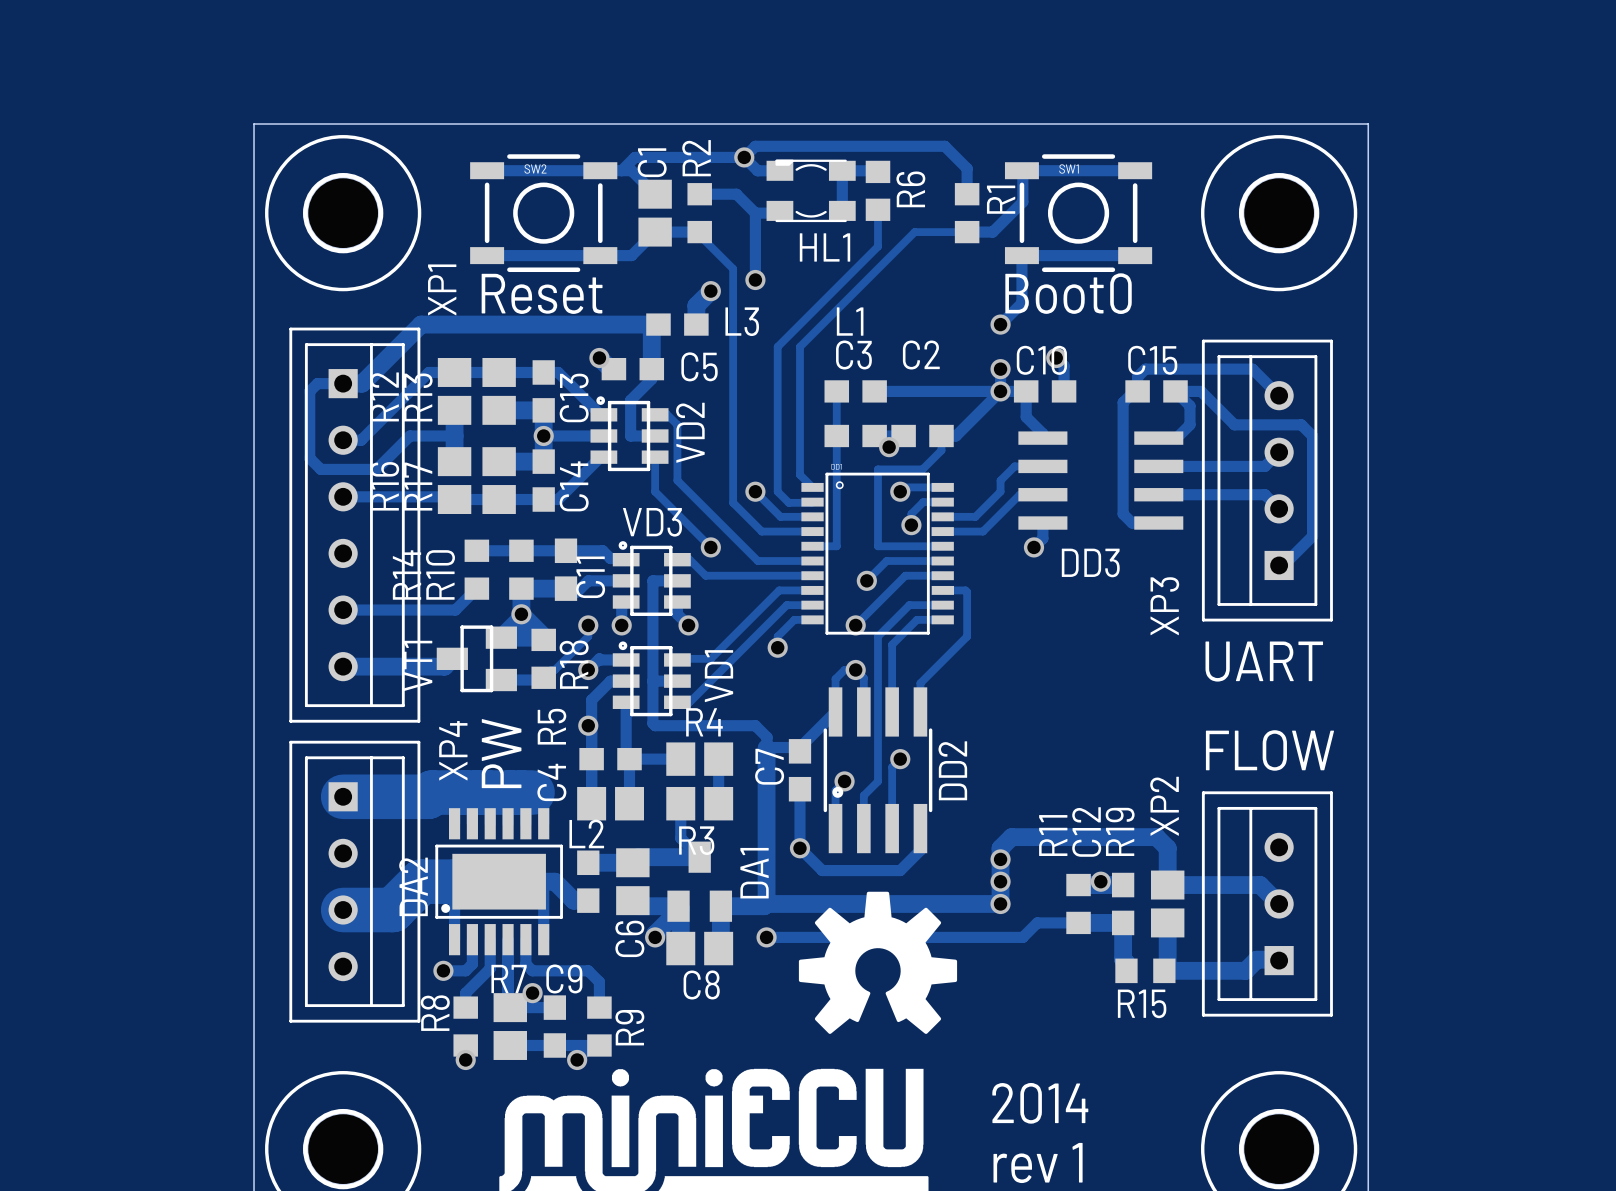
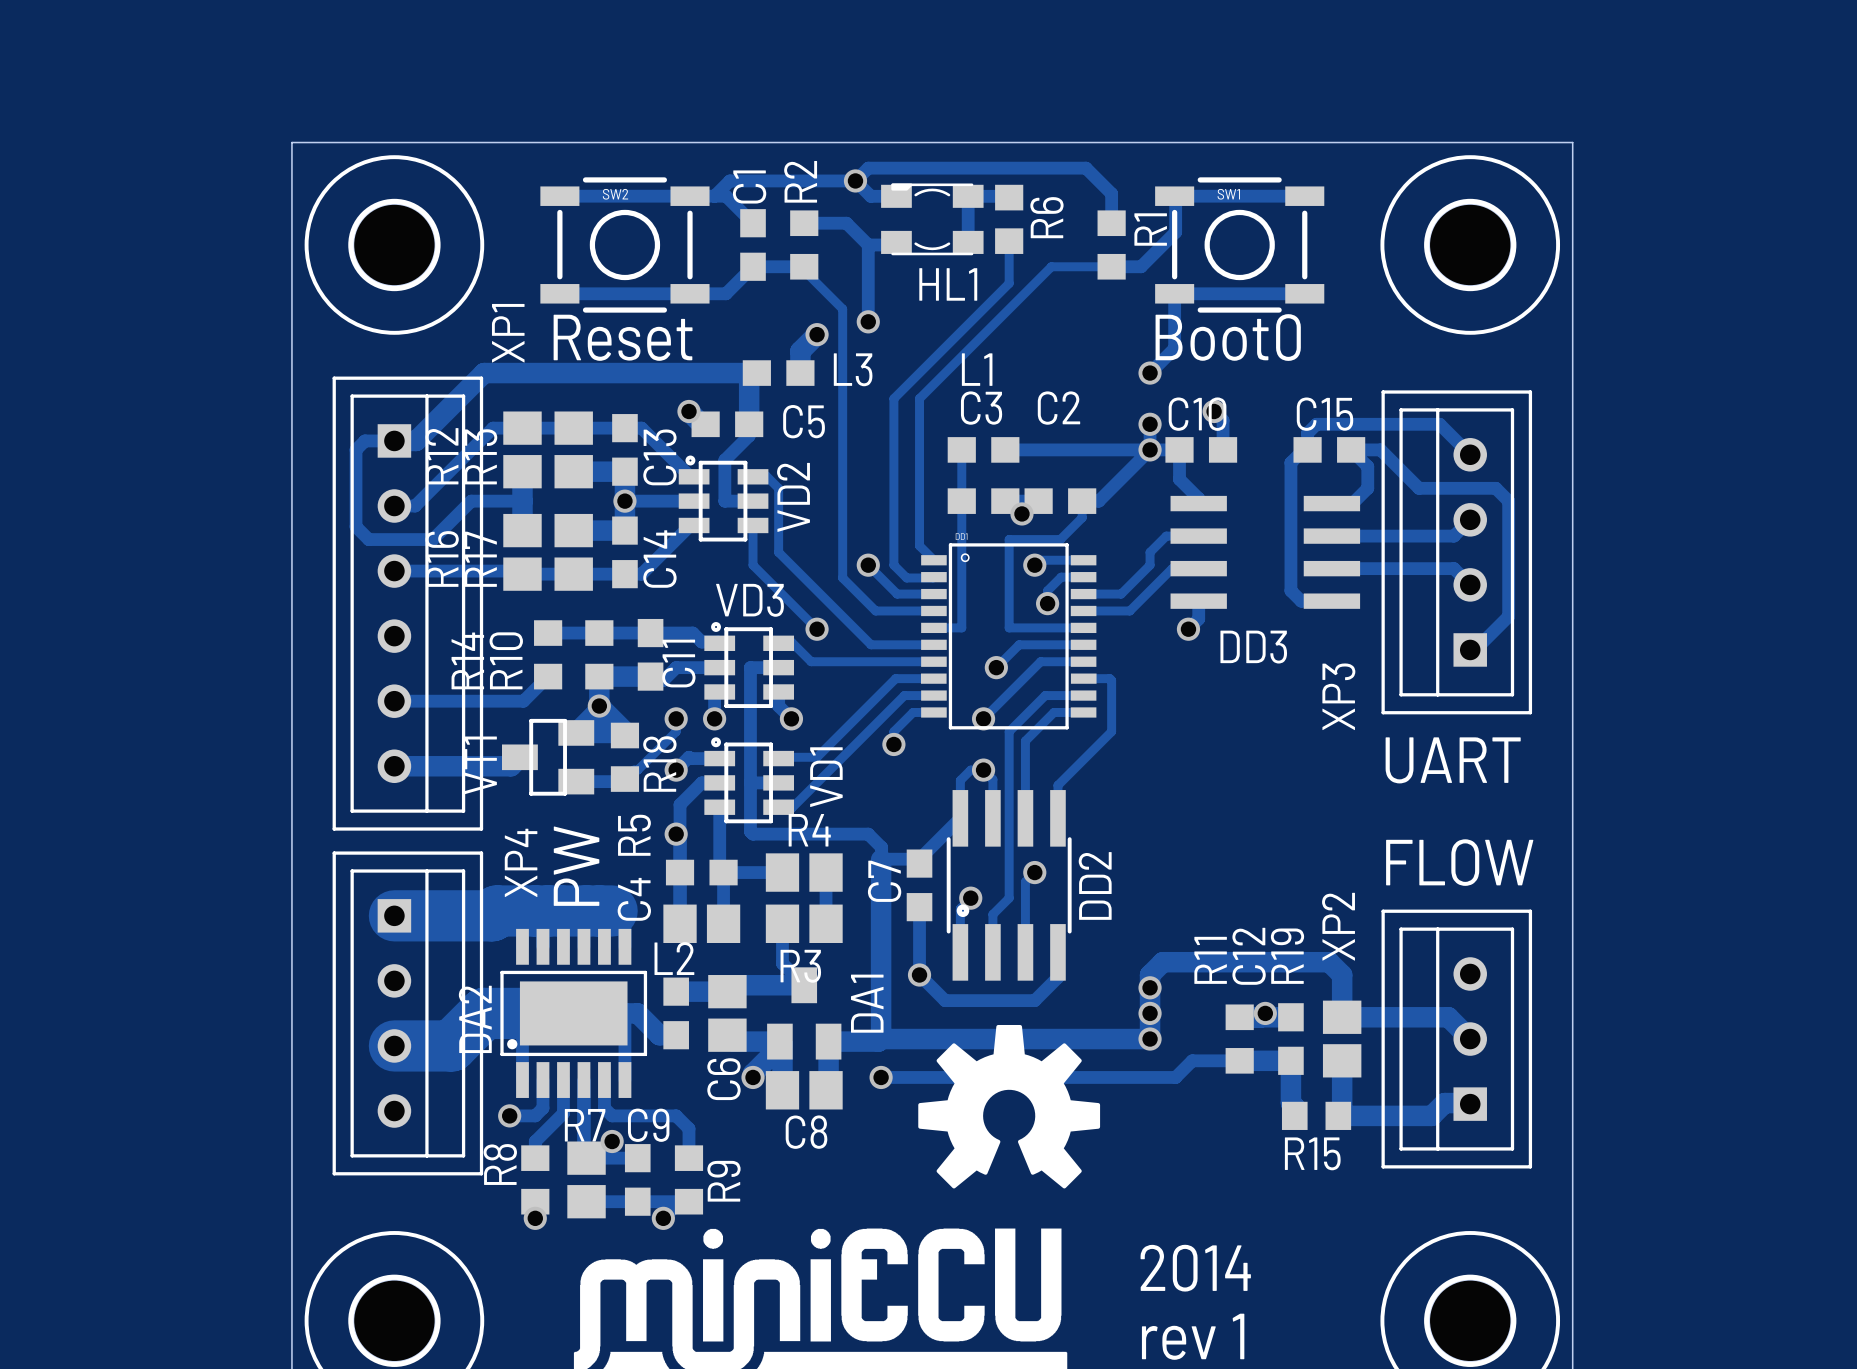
C1 footprint: [638, 179, 672, 247] -> [740, 209, 766, 281]

